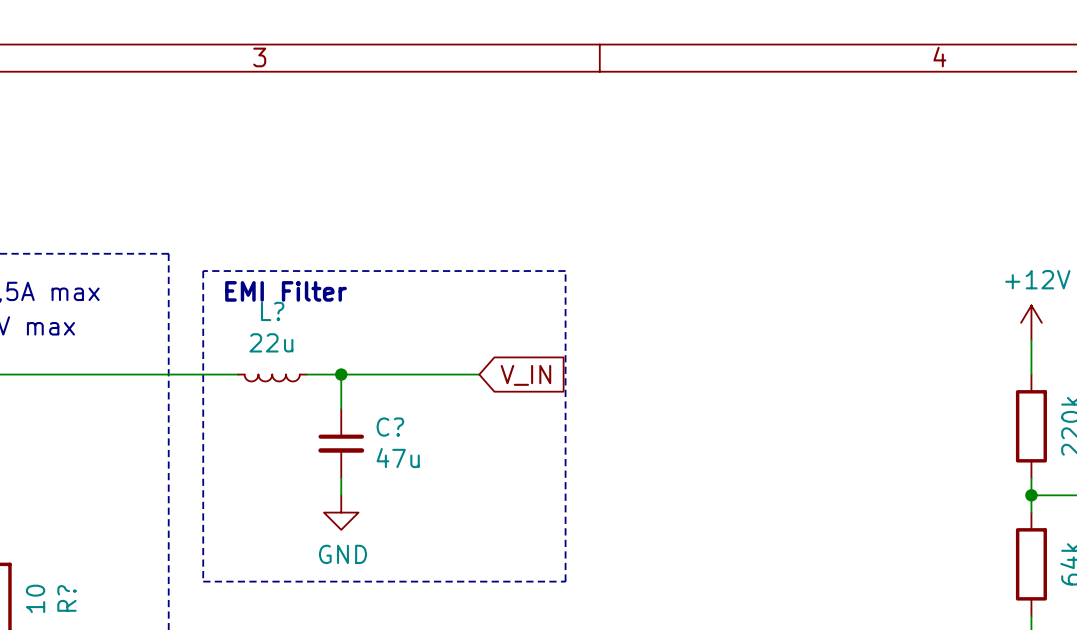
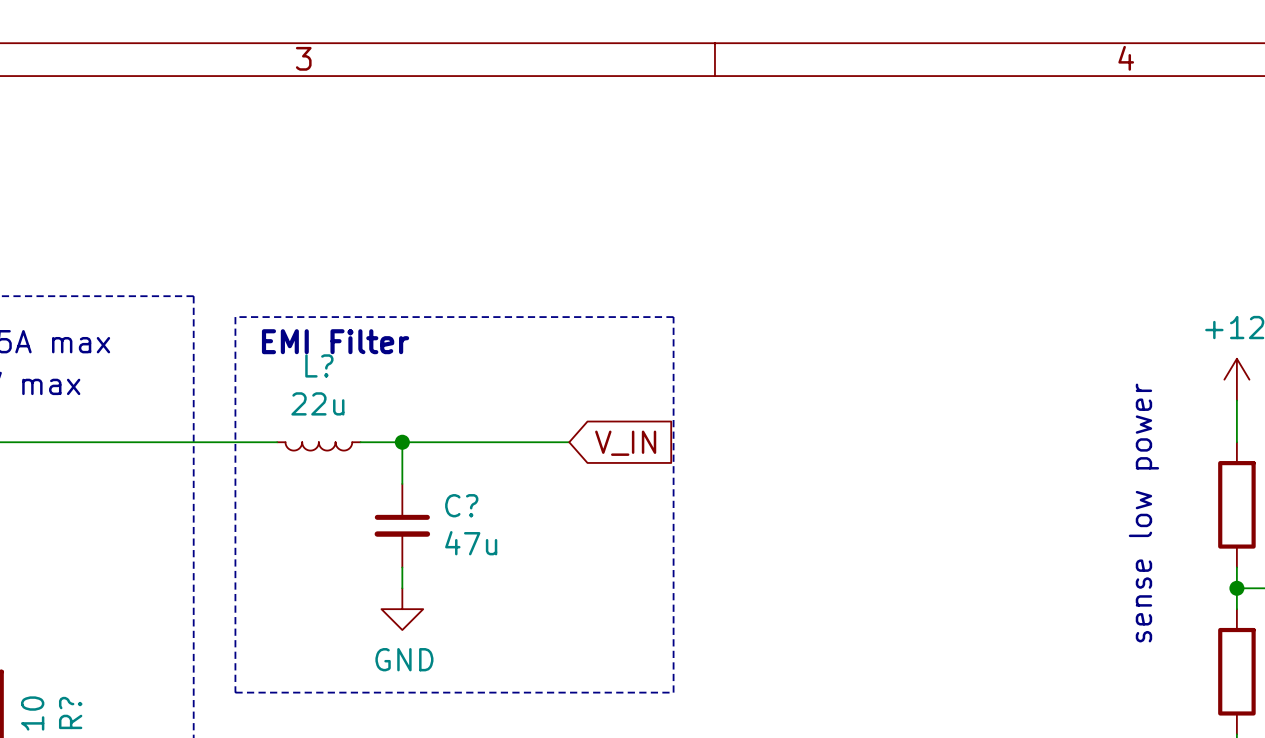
text: none -> sense low power (1143, 512)

